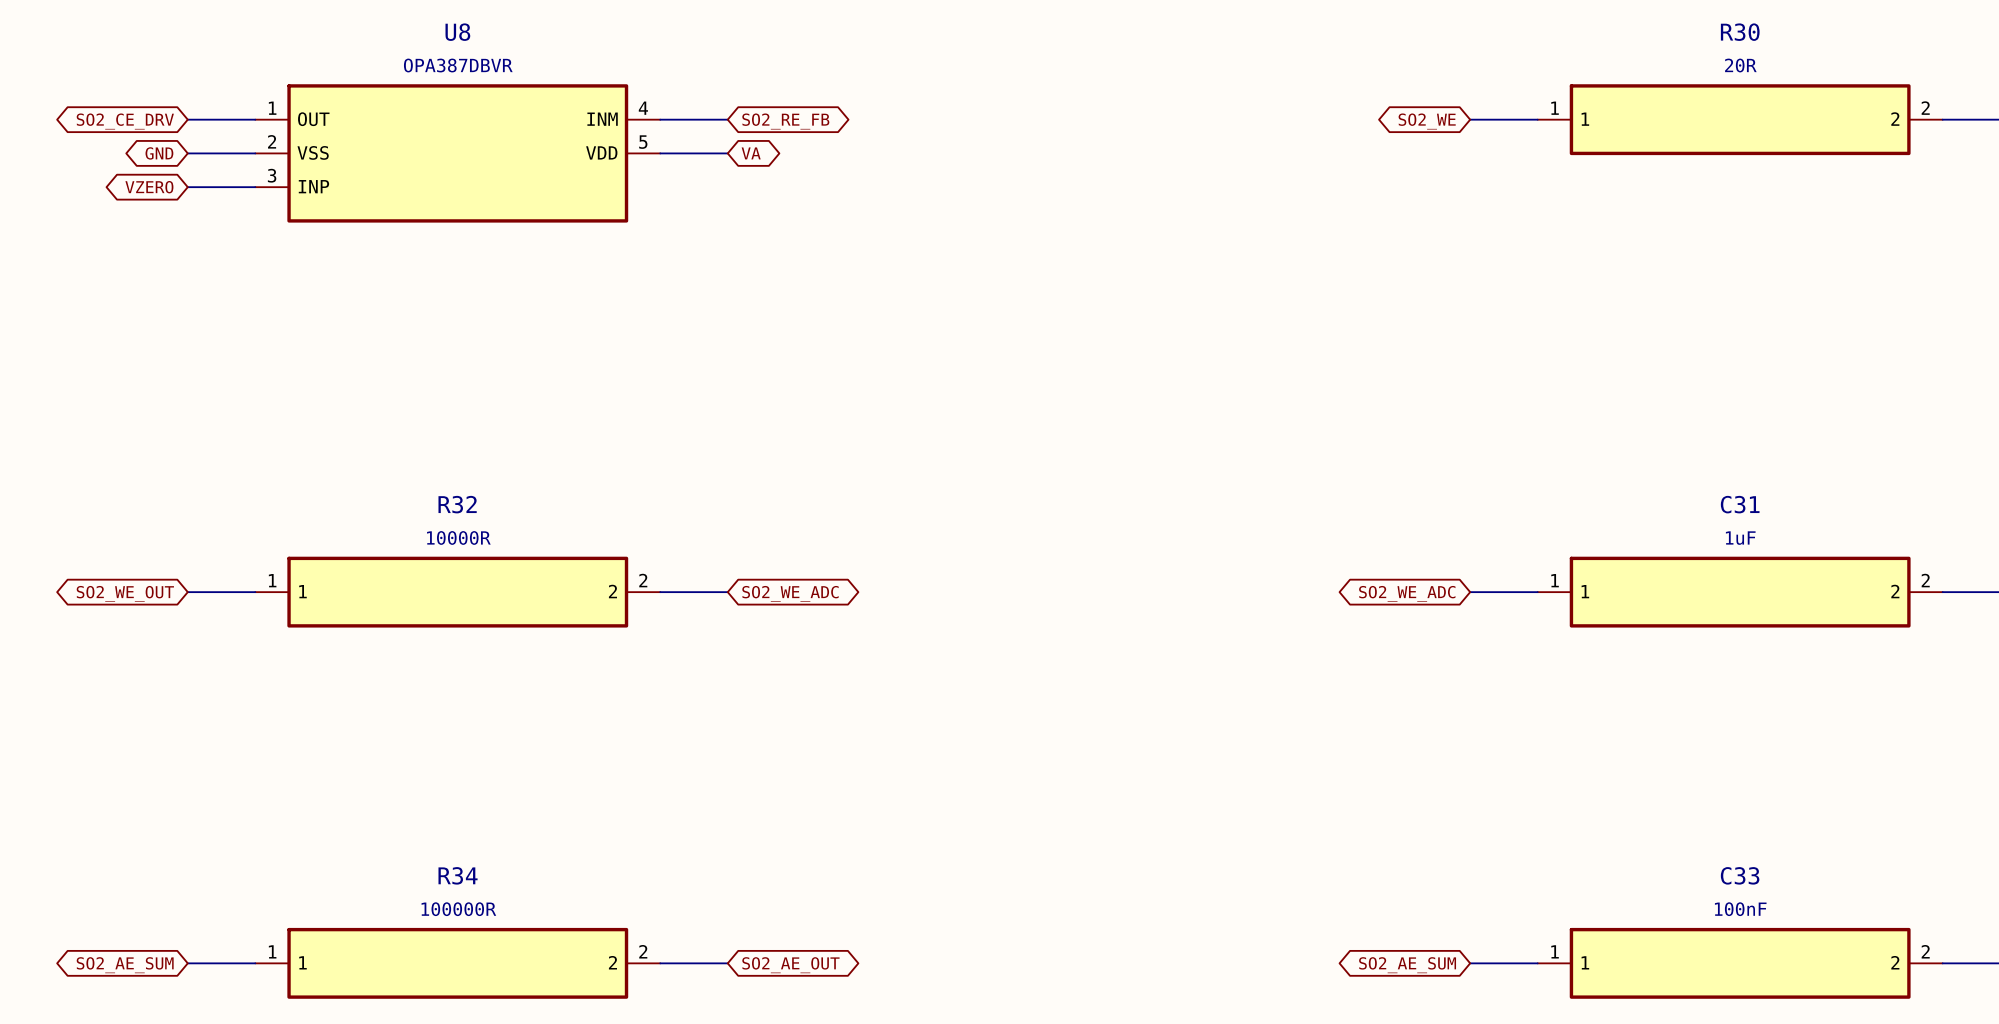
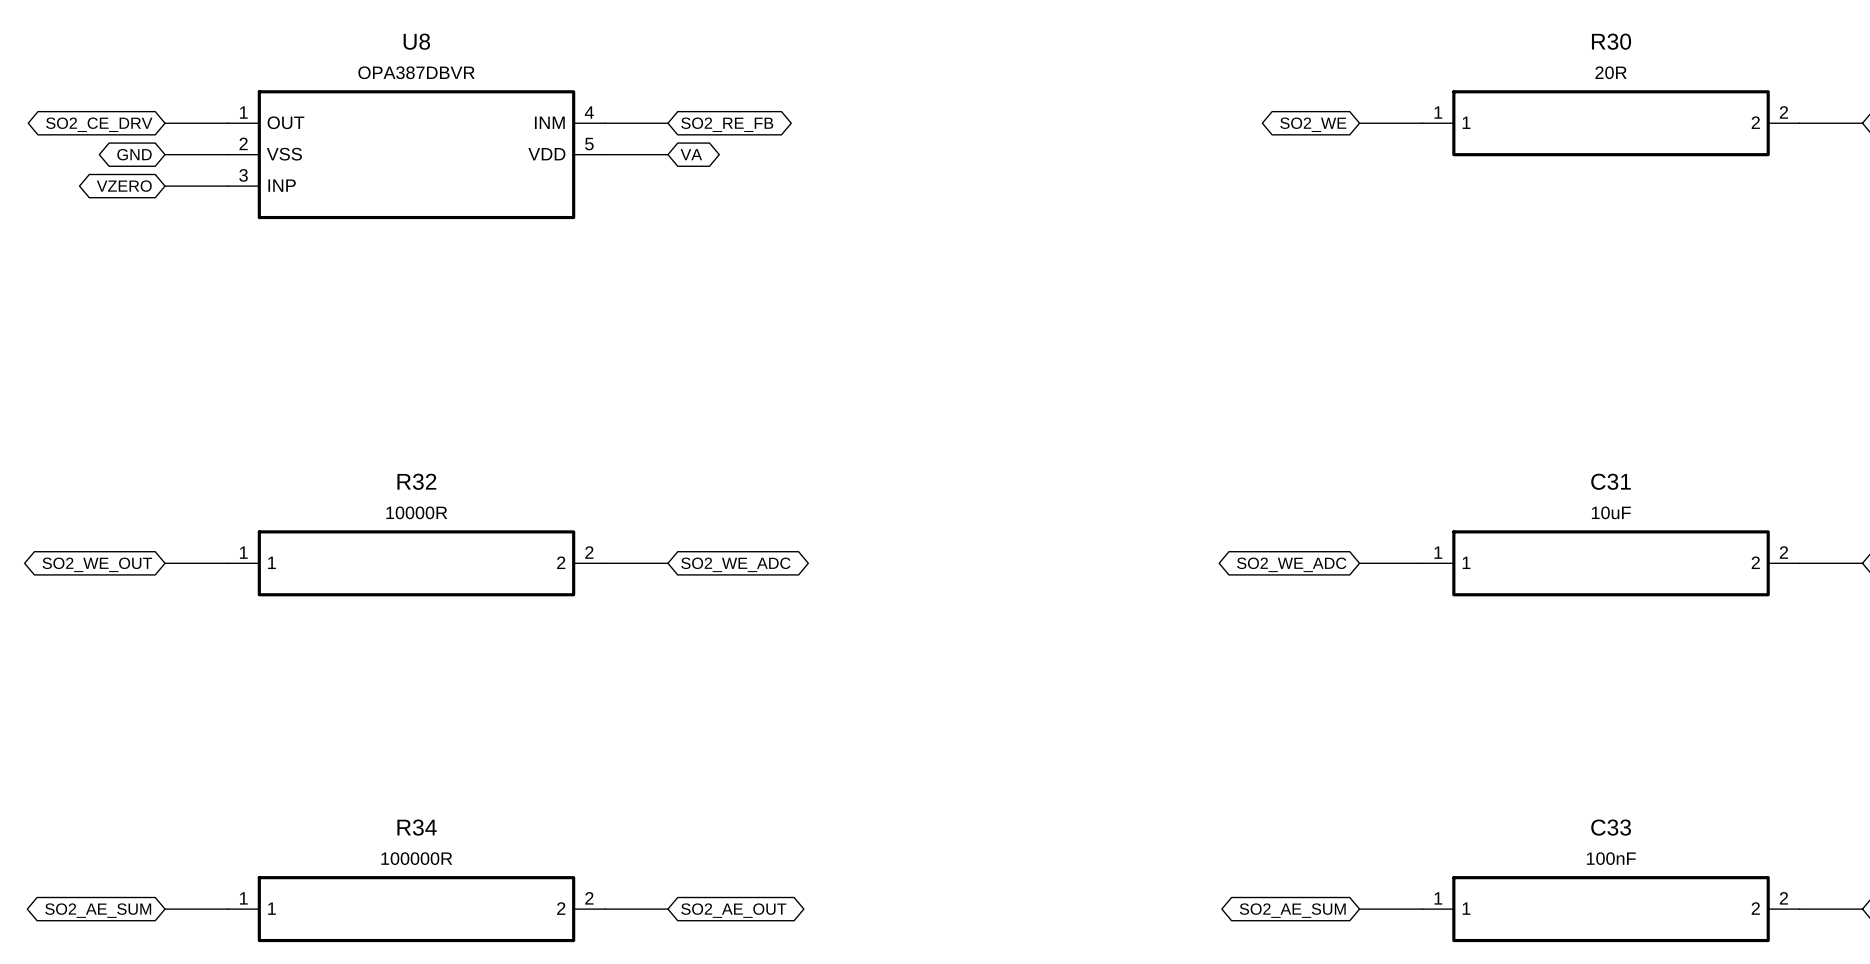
C31 value: 1uF (1740, 538) -> 10uF (1611, 512)

